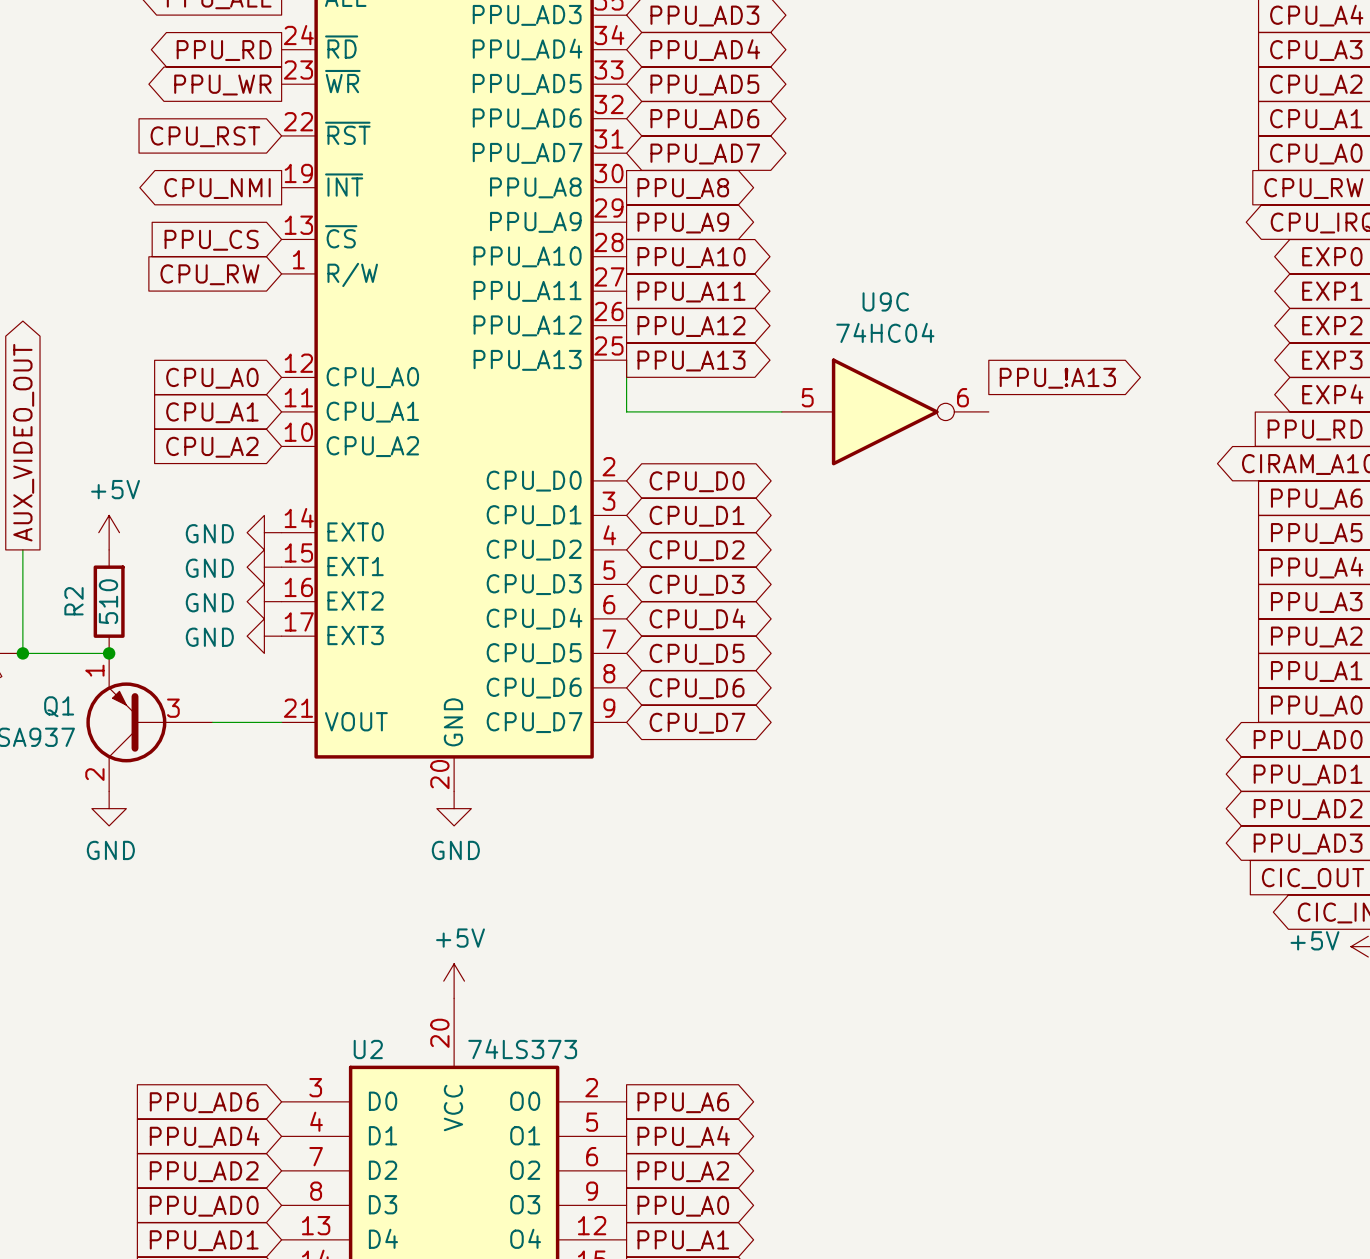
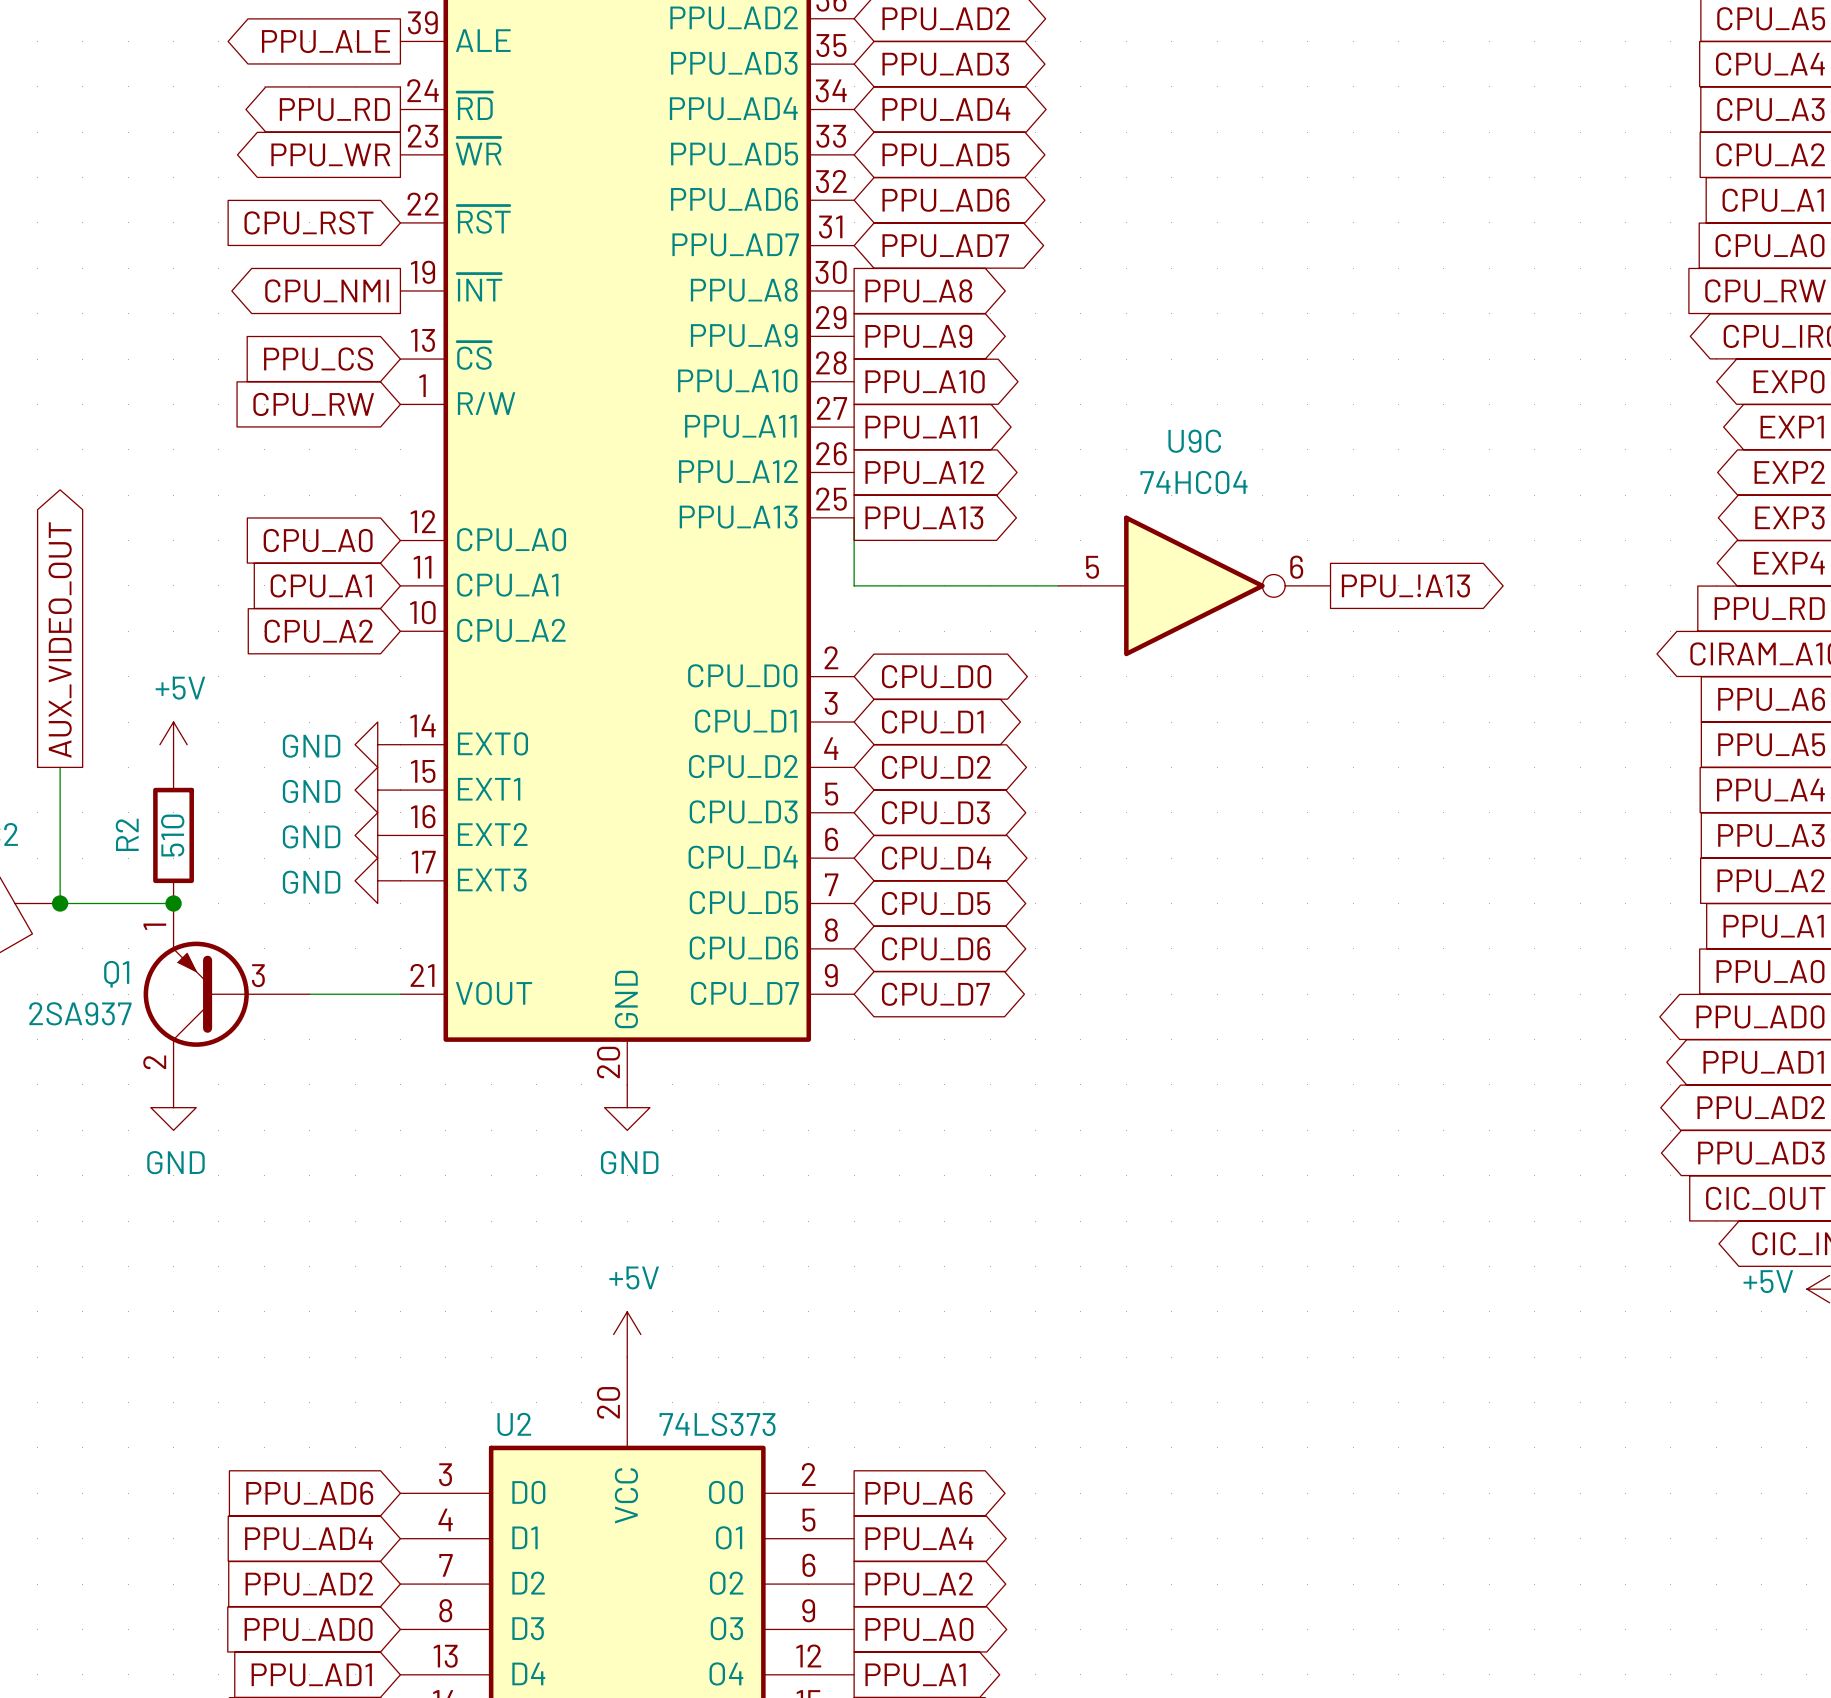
global label position: PPU_!A13 (1057, 378) -> PPU_!A13 (1405, 586)

